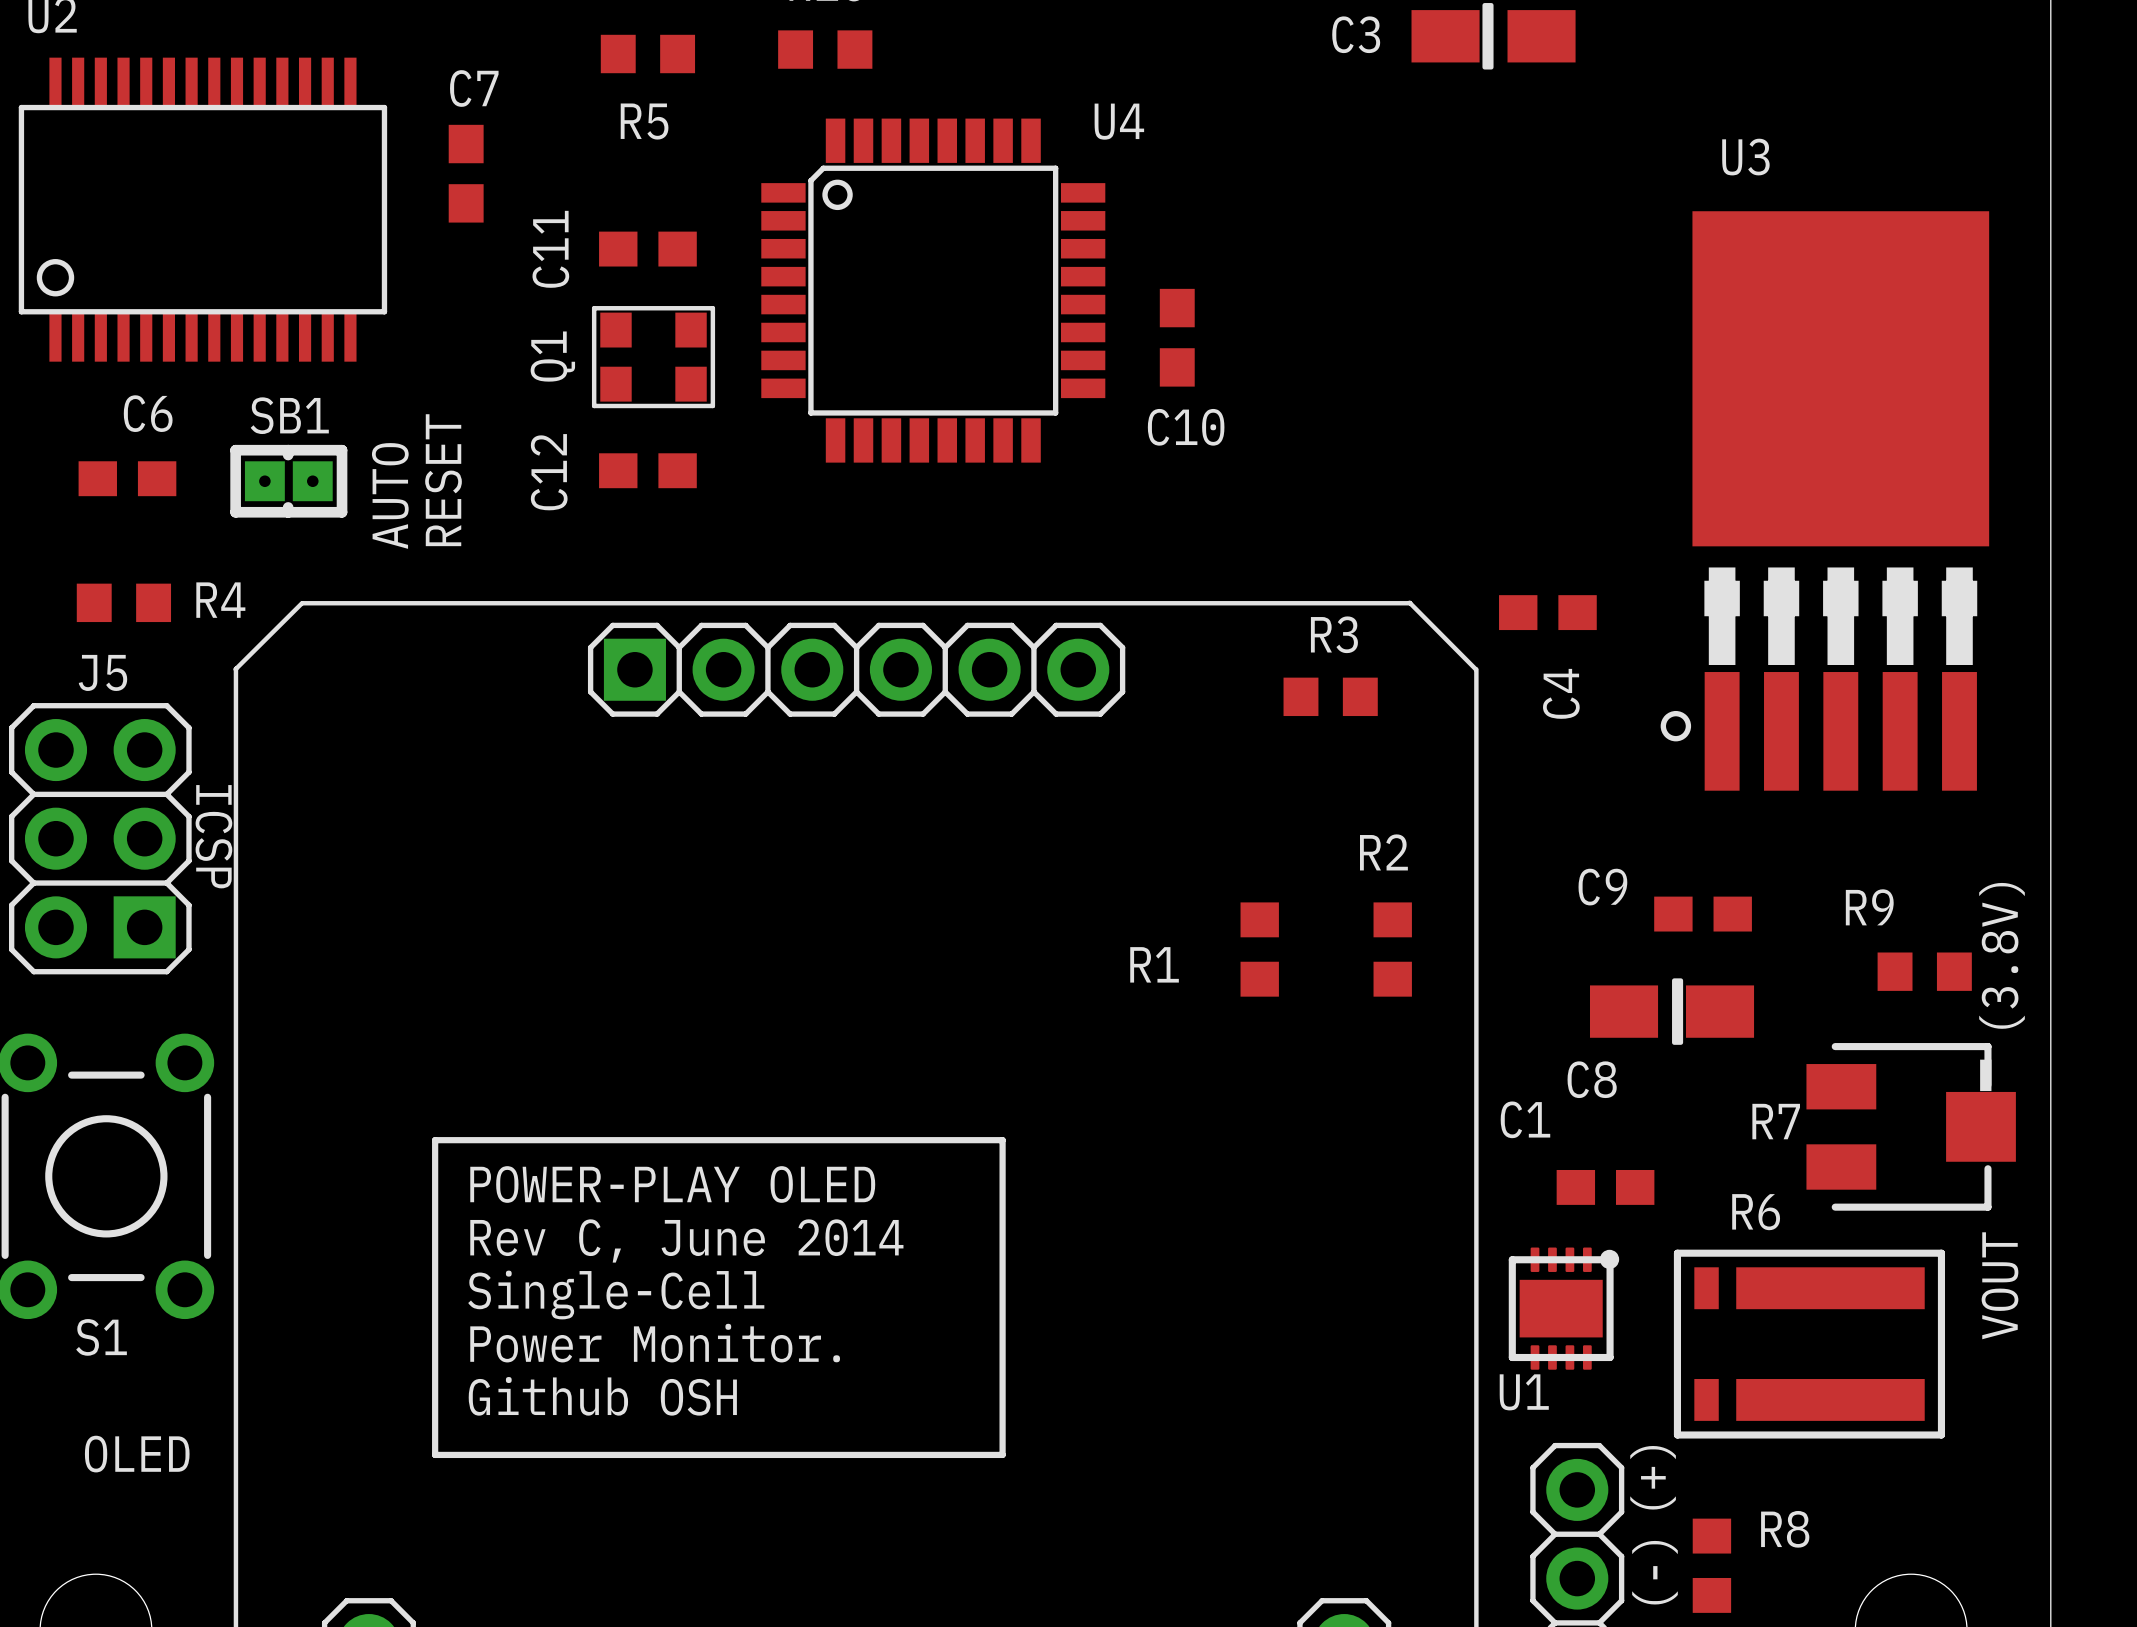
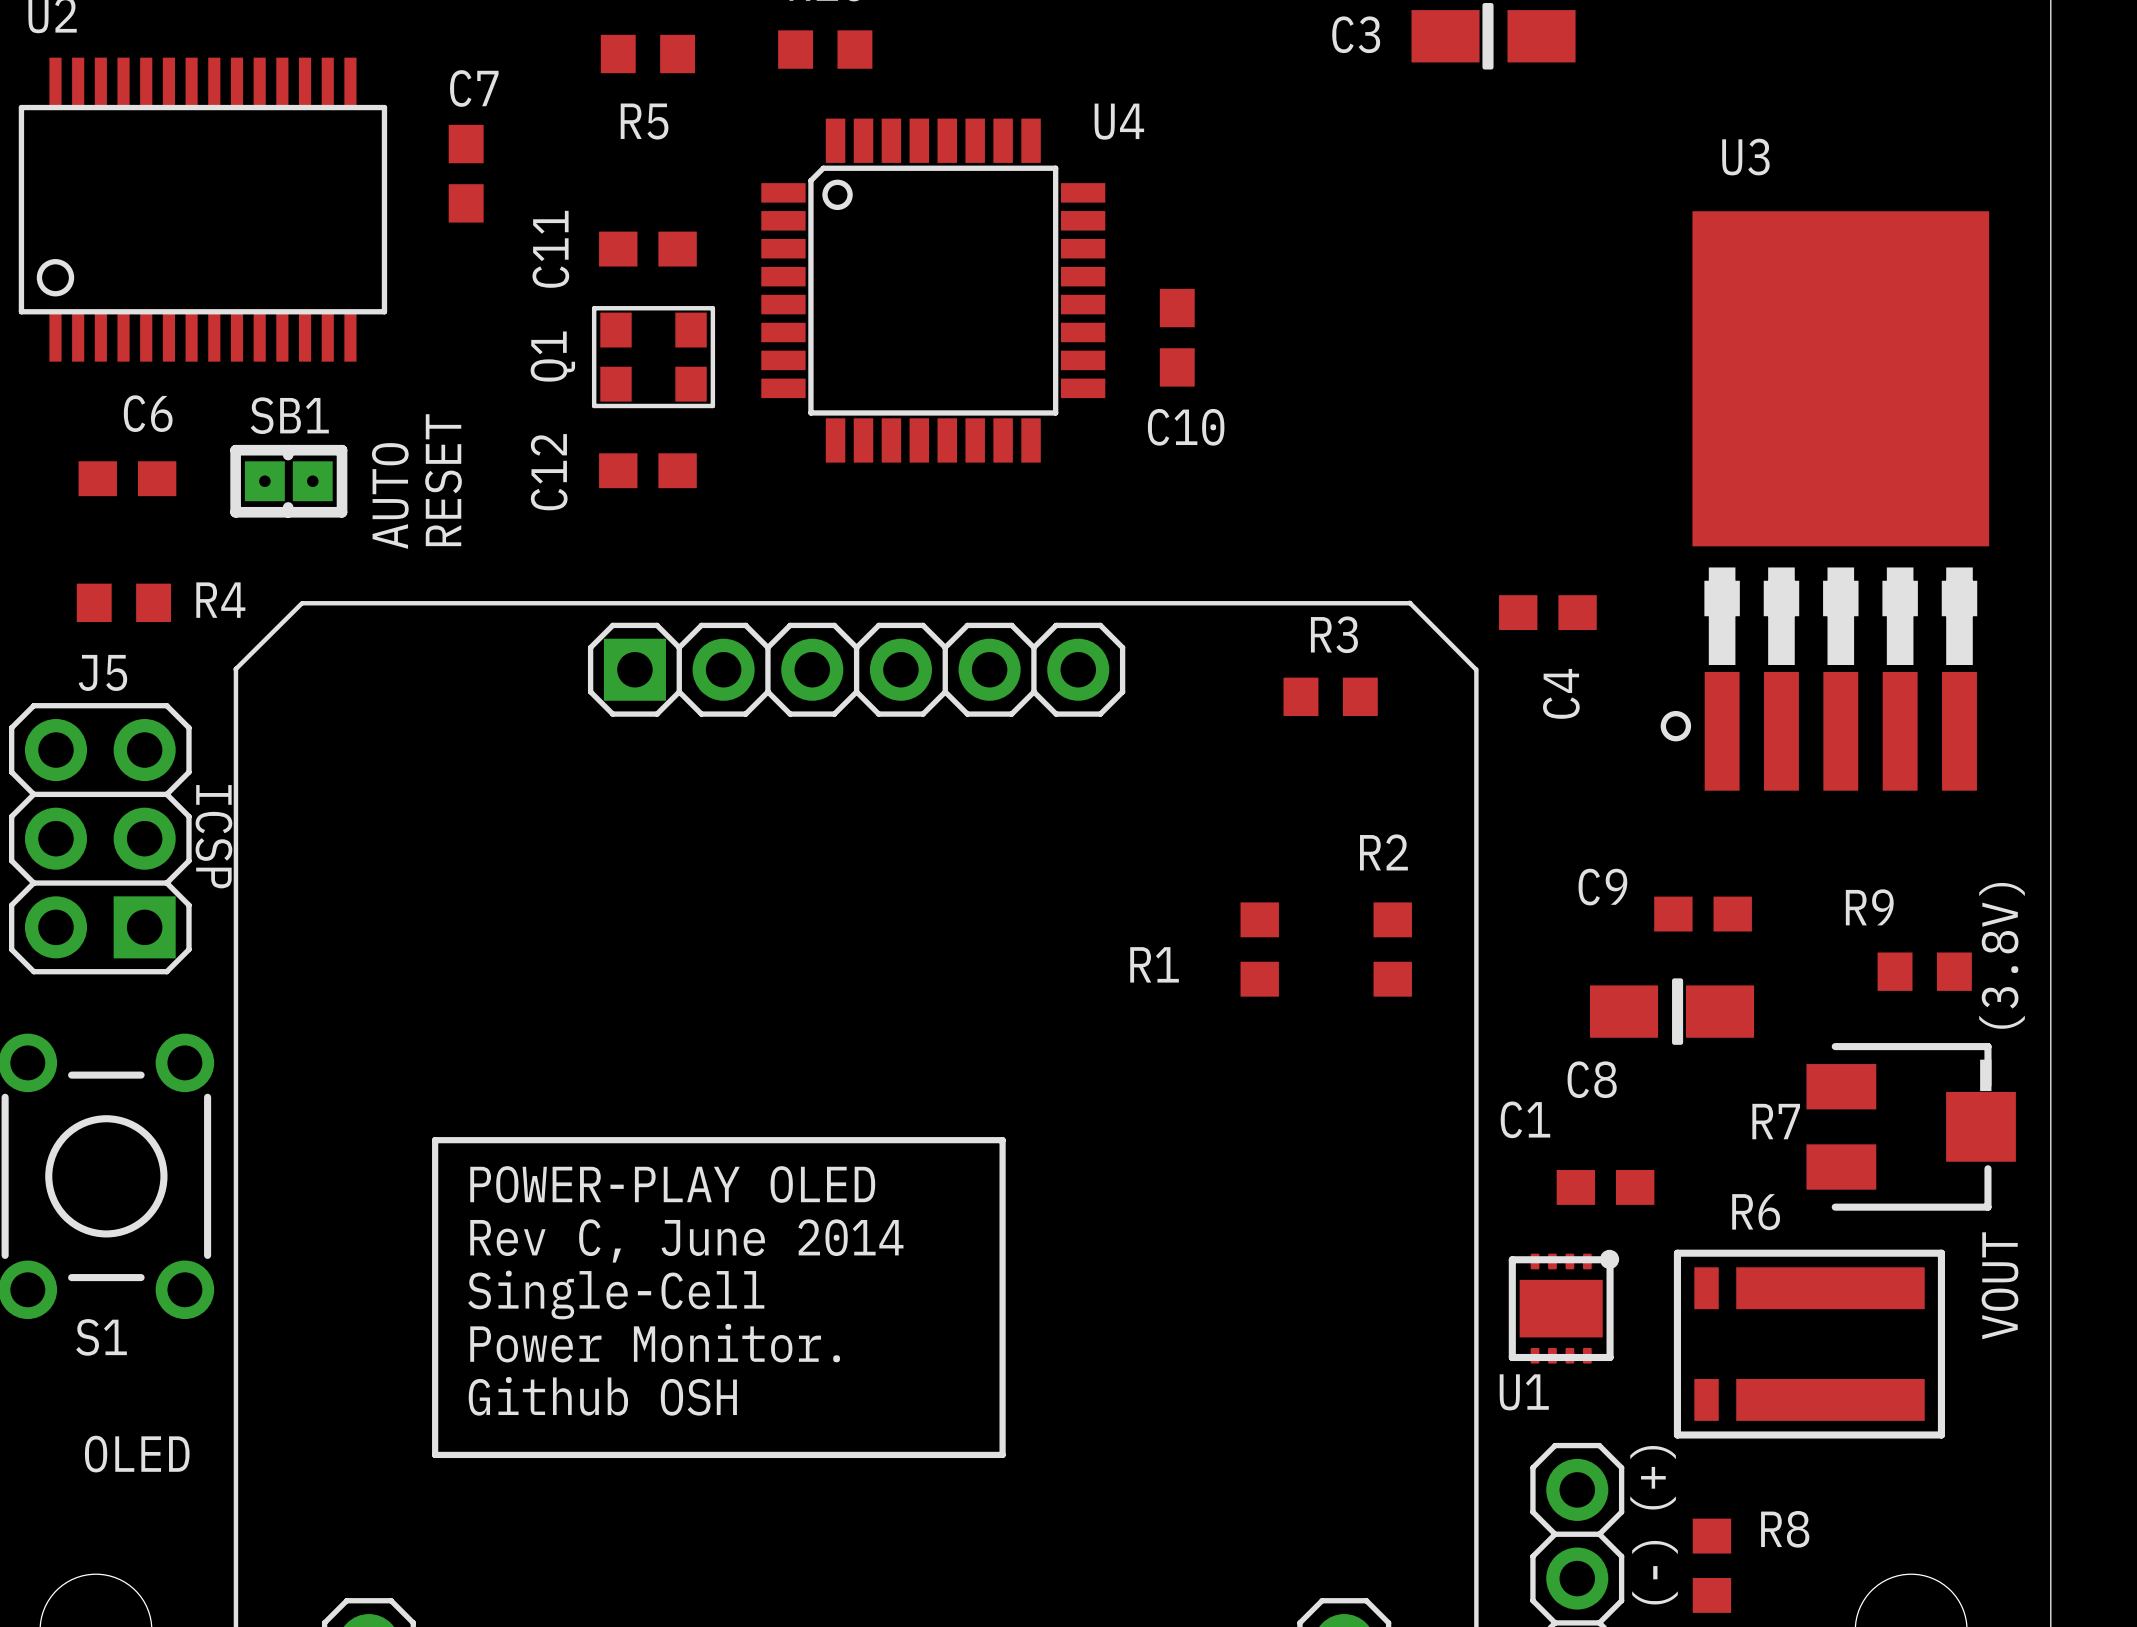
U1 footprint: [1508, 1247, 1620, 1370] -> [1508, 1249, 1620, 1364]

